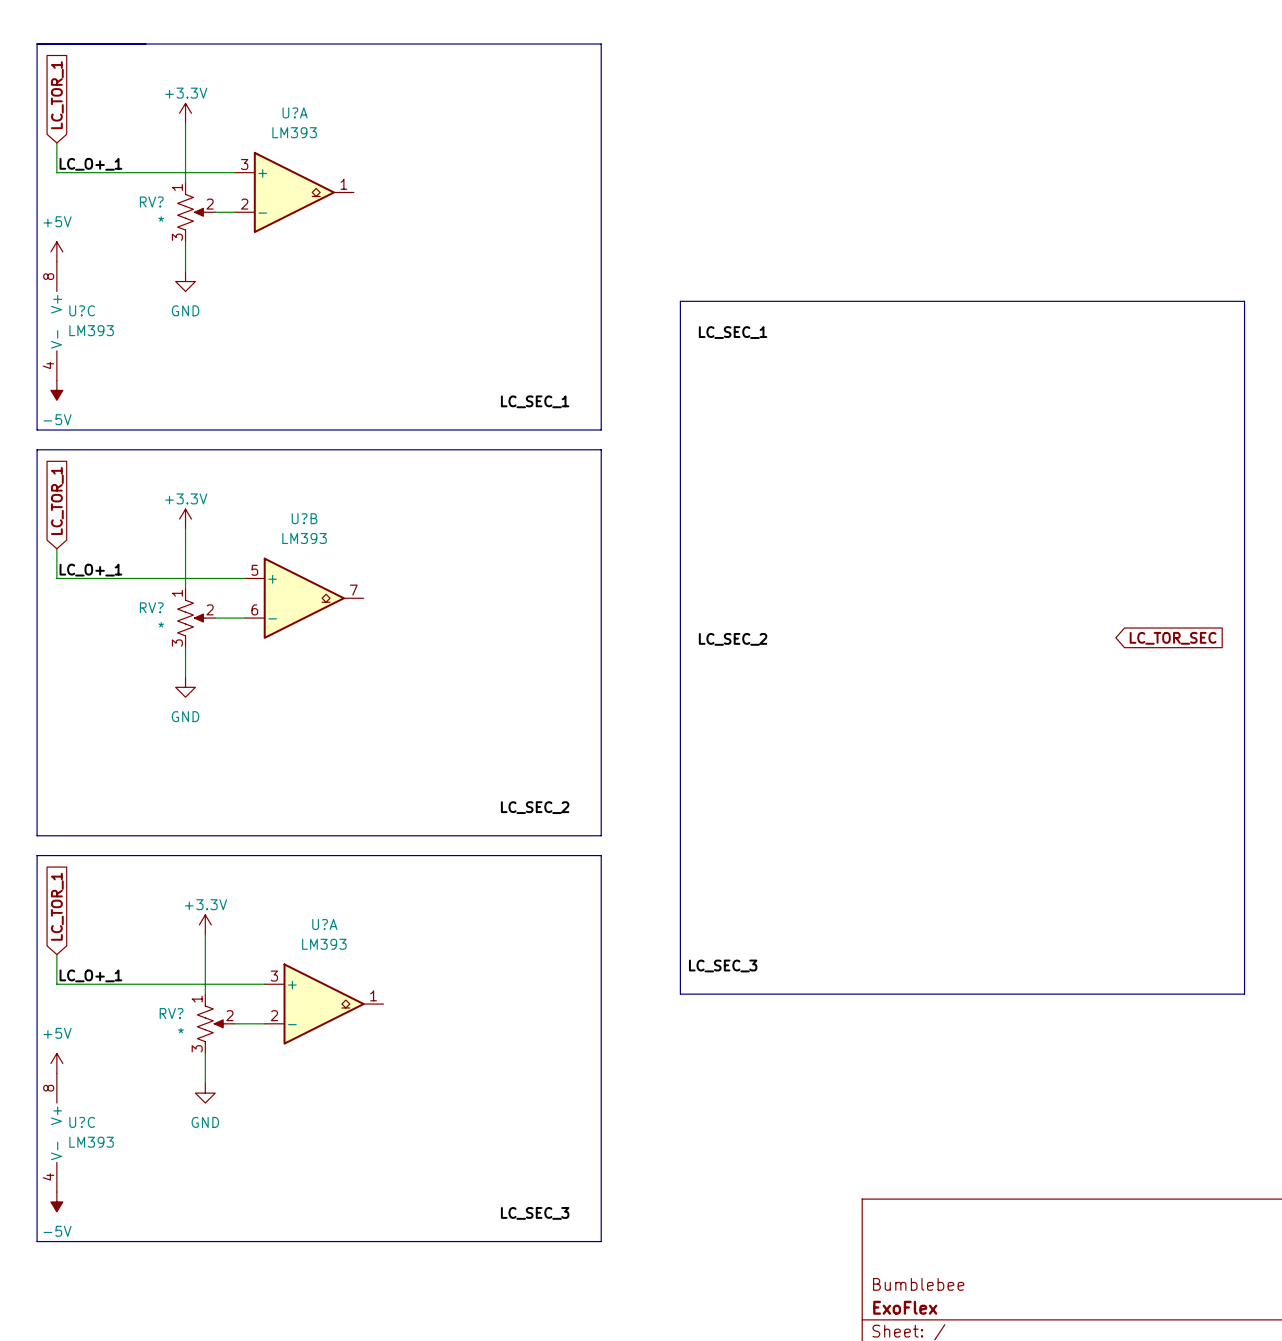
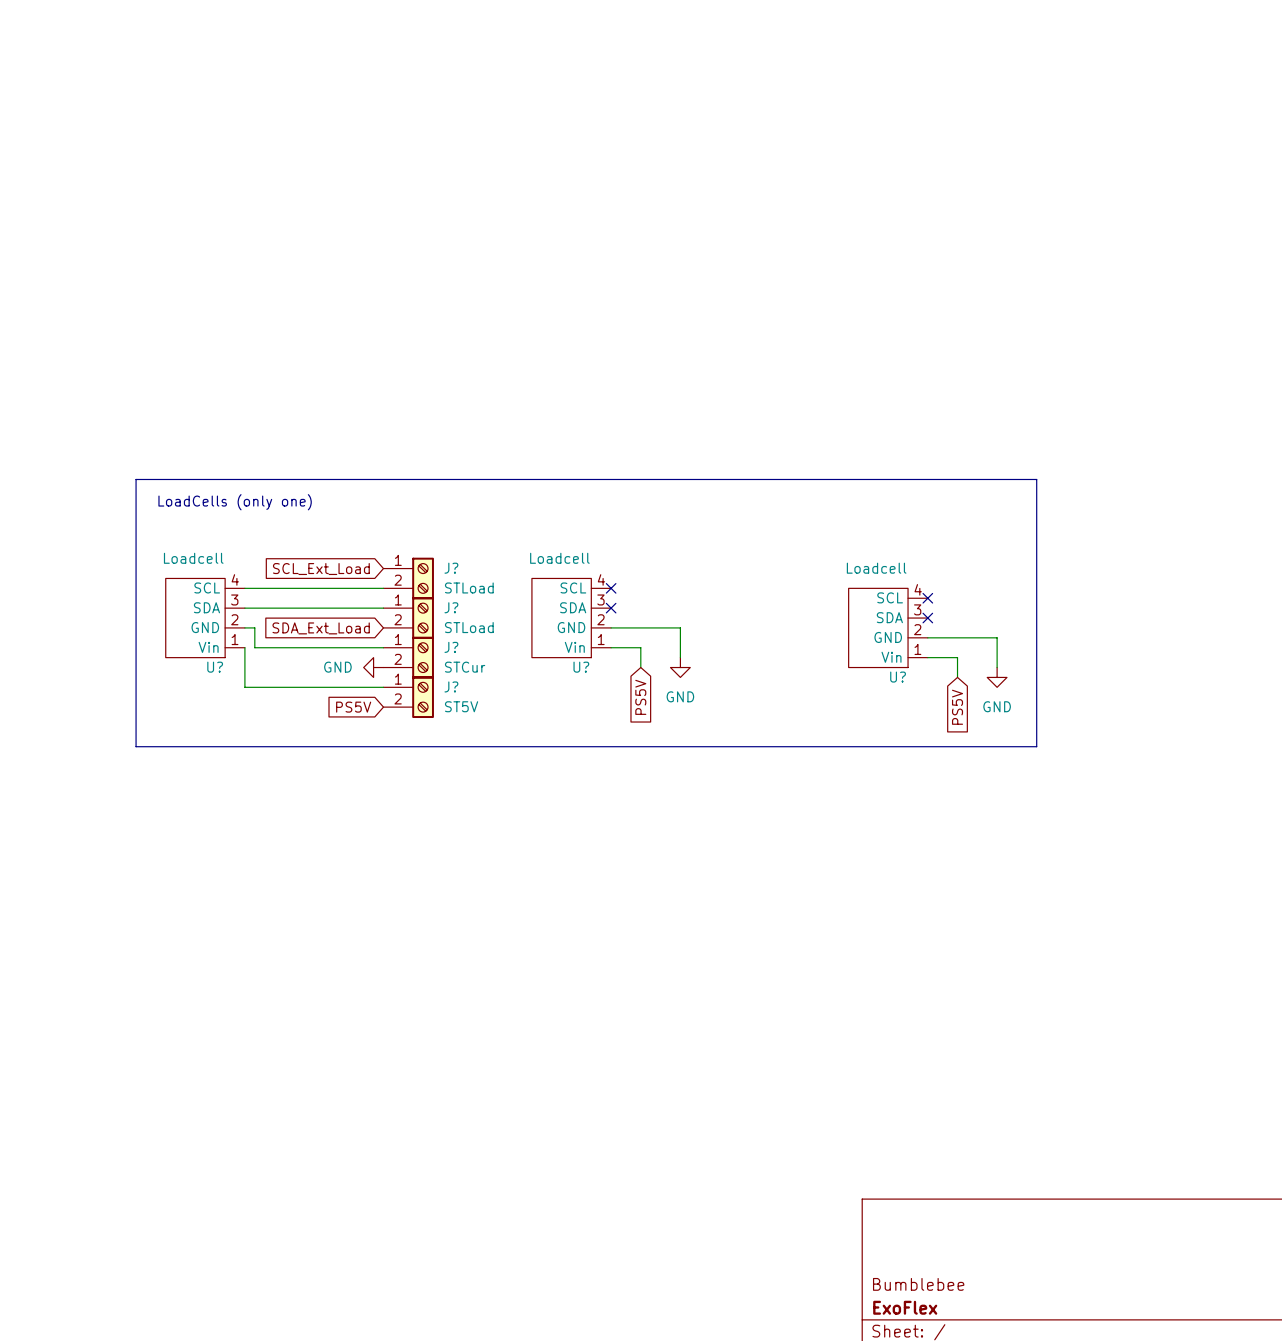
line: (37, 44) (601, 44) (601, 430) (37, 430) (37, 44) -> none
global label: LC_TOR_1 (57, 95) -> none
power symbol: +3.3V (185, 113) -> none
wire: (185, 123) (185, 182) -> none
wire: (56, 142) (56, 172) (235, 172) -> none
label: LC_O+_1 (90, 164) -> none
U?A: LM393 (294, 192) -> none
RV?: * (196, 212) -> none
wire: (215, 212) (235, 212) -> none
wire: (185, 241) (185, 271) -> none
power symbol: +5V (56, 251) -> none
power symbol: GND (185, 281) -> none
line: (680, 301) (1244, 301) (1244, 994) (680, 994) (680, 301) -> none
U?C: LM393 (56, 321) -> none
label: LC_SEC_1 (733, 332) -> none
power symbol: -5V (56, 390) -> none
label: LC_SEC_1 (535, 401) -> none
line: (37, 449) (601, 449) (601, 835) (37, 835) (37, 449) -> none
line: none -> (136, 479) (1036, 479) (1036, 746) (136, 746) (136, 479)
global label: LC_TOR_1 (57, 500) -> none
text: none -> LoadCells (only one) (235, 502)
power symbol: +3.3V (185, 519) -> none
wire: (185, 528) (185, 588) -> none
wire: (56, 548) (56, 578) (244, 578) -> none
global label: none -> SCL_Ext_Load (321, 569)
label: LC_O+_1 (90, 570) -> none
J?: none -> STLoad (408, 578)
wire: none -> (244, 588) (383, 588)
no-connect mark: none -> (611, 588)
U?B: LM393 (304, 598) -> none
no-connect mark: none -> (927, 598)
wire: none -> (244, 608) (383, 608)
no-connect mark: none -> (611, 608)
RV?: * (196, 618) -> none
U?: none -> Loadcell (205, 618)
wire: (215, 618) (244, 618) -> none
J?: none -> STLoad (408, 618)
U?: none -> Loadcell (571, 618)
no-connect mark: none -> (927, 618)
wire: none -> (244, 627) (254, 627) (254, 647) (383, 647)
wire: none -> (611, 627) (680, 627) (680, 657)
U?: none -> Loadcell (888, 627)
global label: none -> SDA_Ext_Load (321, 628)
wire: none -> (927, 637) (997, 637) (997, 667)
global label: LC_TOR_SEC (1173, 638) -> none
label: LC_SEC_2 (733, 639) -> none
wire: (185, 647) (185, 677) -> none
wire: none -> (244, 647) (244, 687) (383, 687)
wire: none -> (611, 647) (640, 647) (640, 667)
J?: none -> STCur (408, 657)
wire: none -> (927, 657) (957, 657) (957, 677)
power symbol: none -> GND (680, 667)
power symbol: none -> GND (997, 677)
power symbol rotation: 0° (185, 687) -> 90° clockwise (373, 667)
power symbol position: GND (185, 687) -> GND (373, 667)
J?: none -> ST5V (408, 697)
global label: none -> PS5V (640, 697)
global label: none -> PS5V (353, 707)
global label: none -> PS5V (957, 707)
label: LC_SEC_2 (535, 807) -> none
line: (37, 855) (601, 855) (601, 1241) (37, 1241) (37, 855) -> none
global label: LC_TOR_1 (57, 906) -> none
power symbol: +3.3V (205, 924) -> none
wire: (205, 934) (205, 994) -> none
wire: (56, 954) (56, 984) (264, 984) -> none
label: LC_SEC_3 (723, 965) -> none
label: LC_O+_1 (90, 975) -> none
U?A: LM393 (324, 1004) -> none
RV?: * (216, 1023) -> none
wire: (235, 1023) (264, 1023) -> none
wire: (205, 1053) (205, 1083) -> none
power symbol: +5V (56, 1063) -> none
power symbol: GND (205, 1093) -> none
U?C: LM393 (56, 1132) -> none
power symbol: -5V (56, 1201) -> none
label: LC_SEC_3 (535, 1213) -> none

